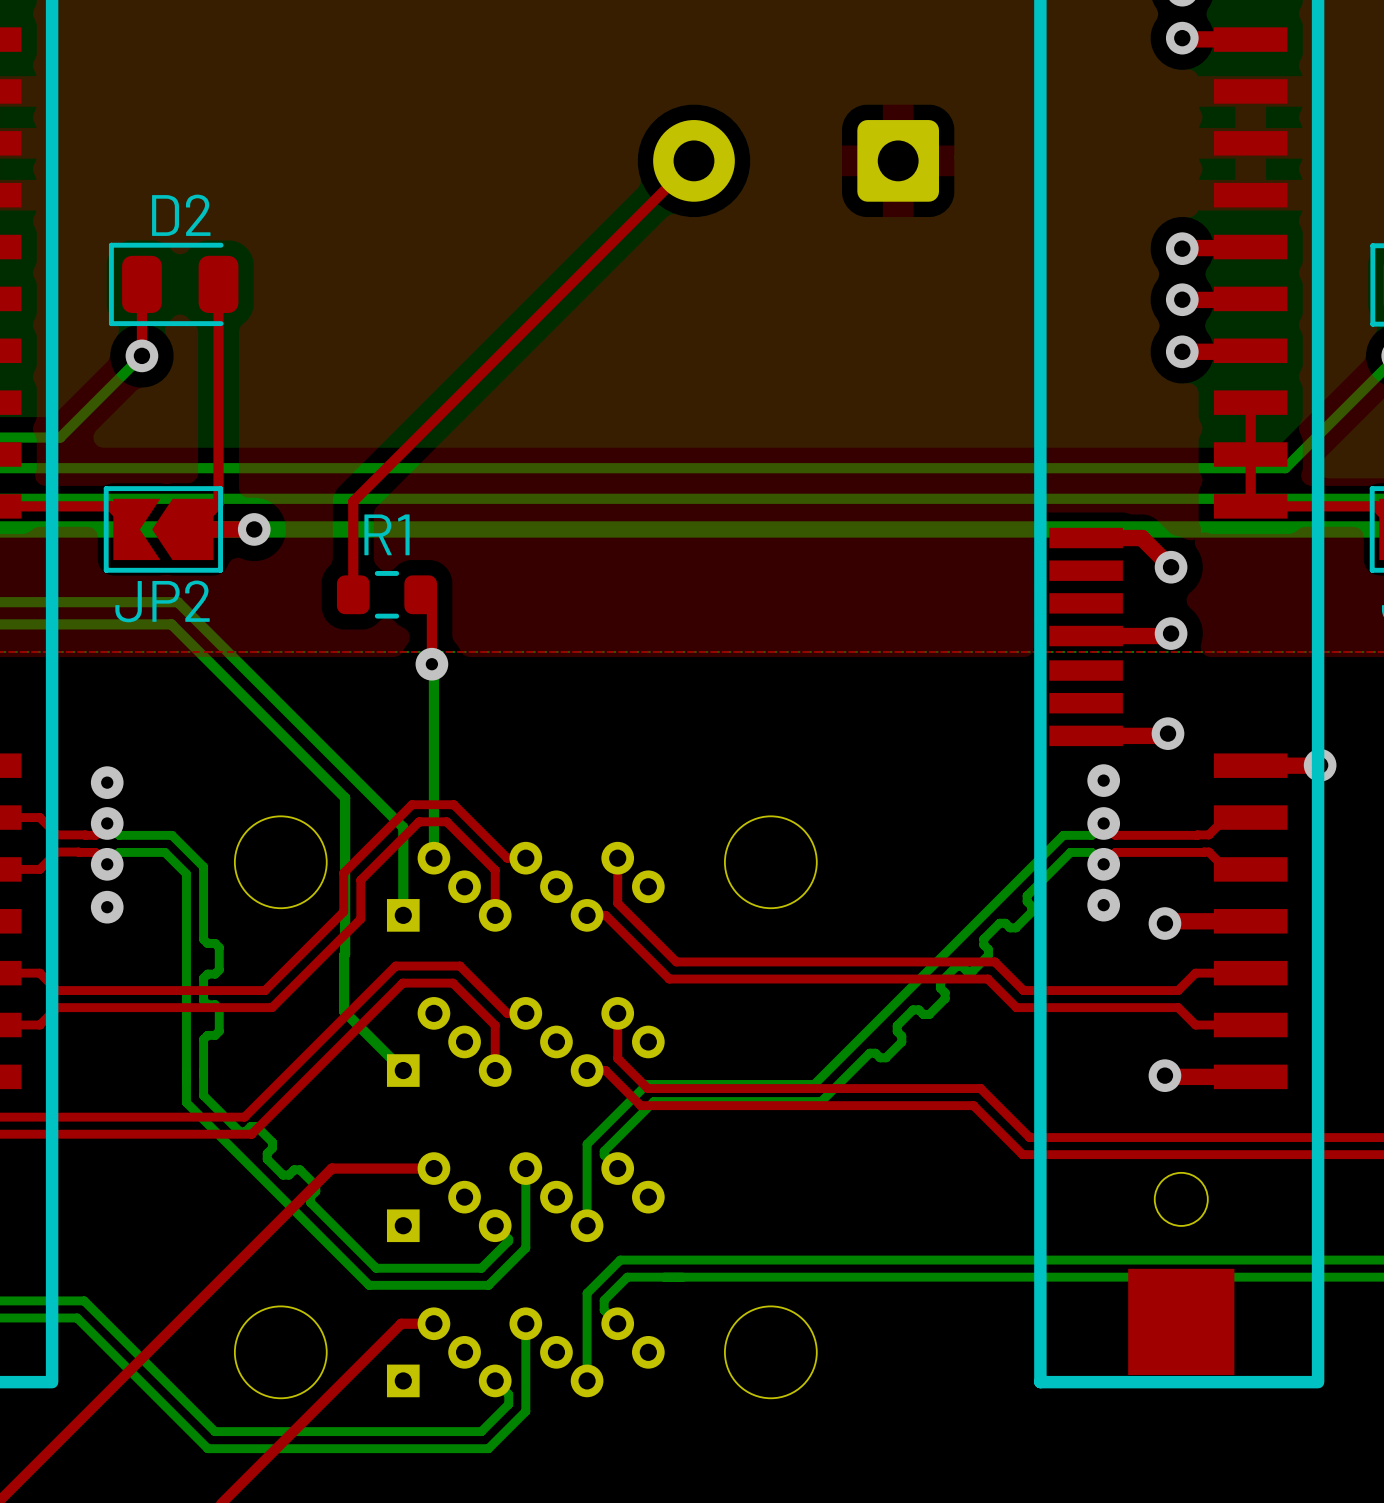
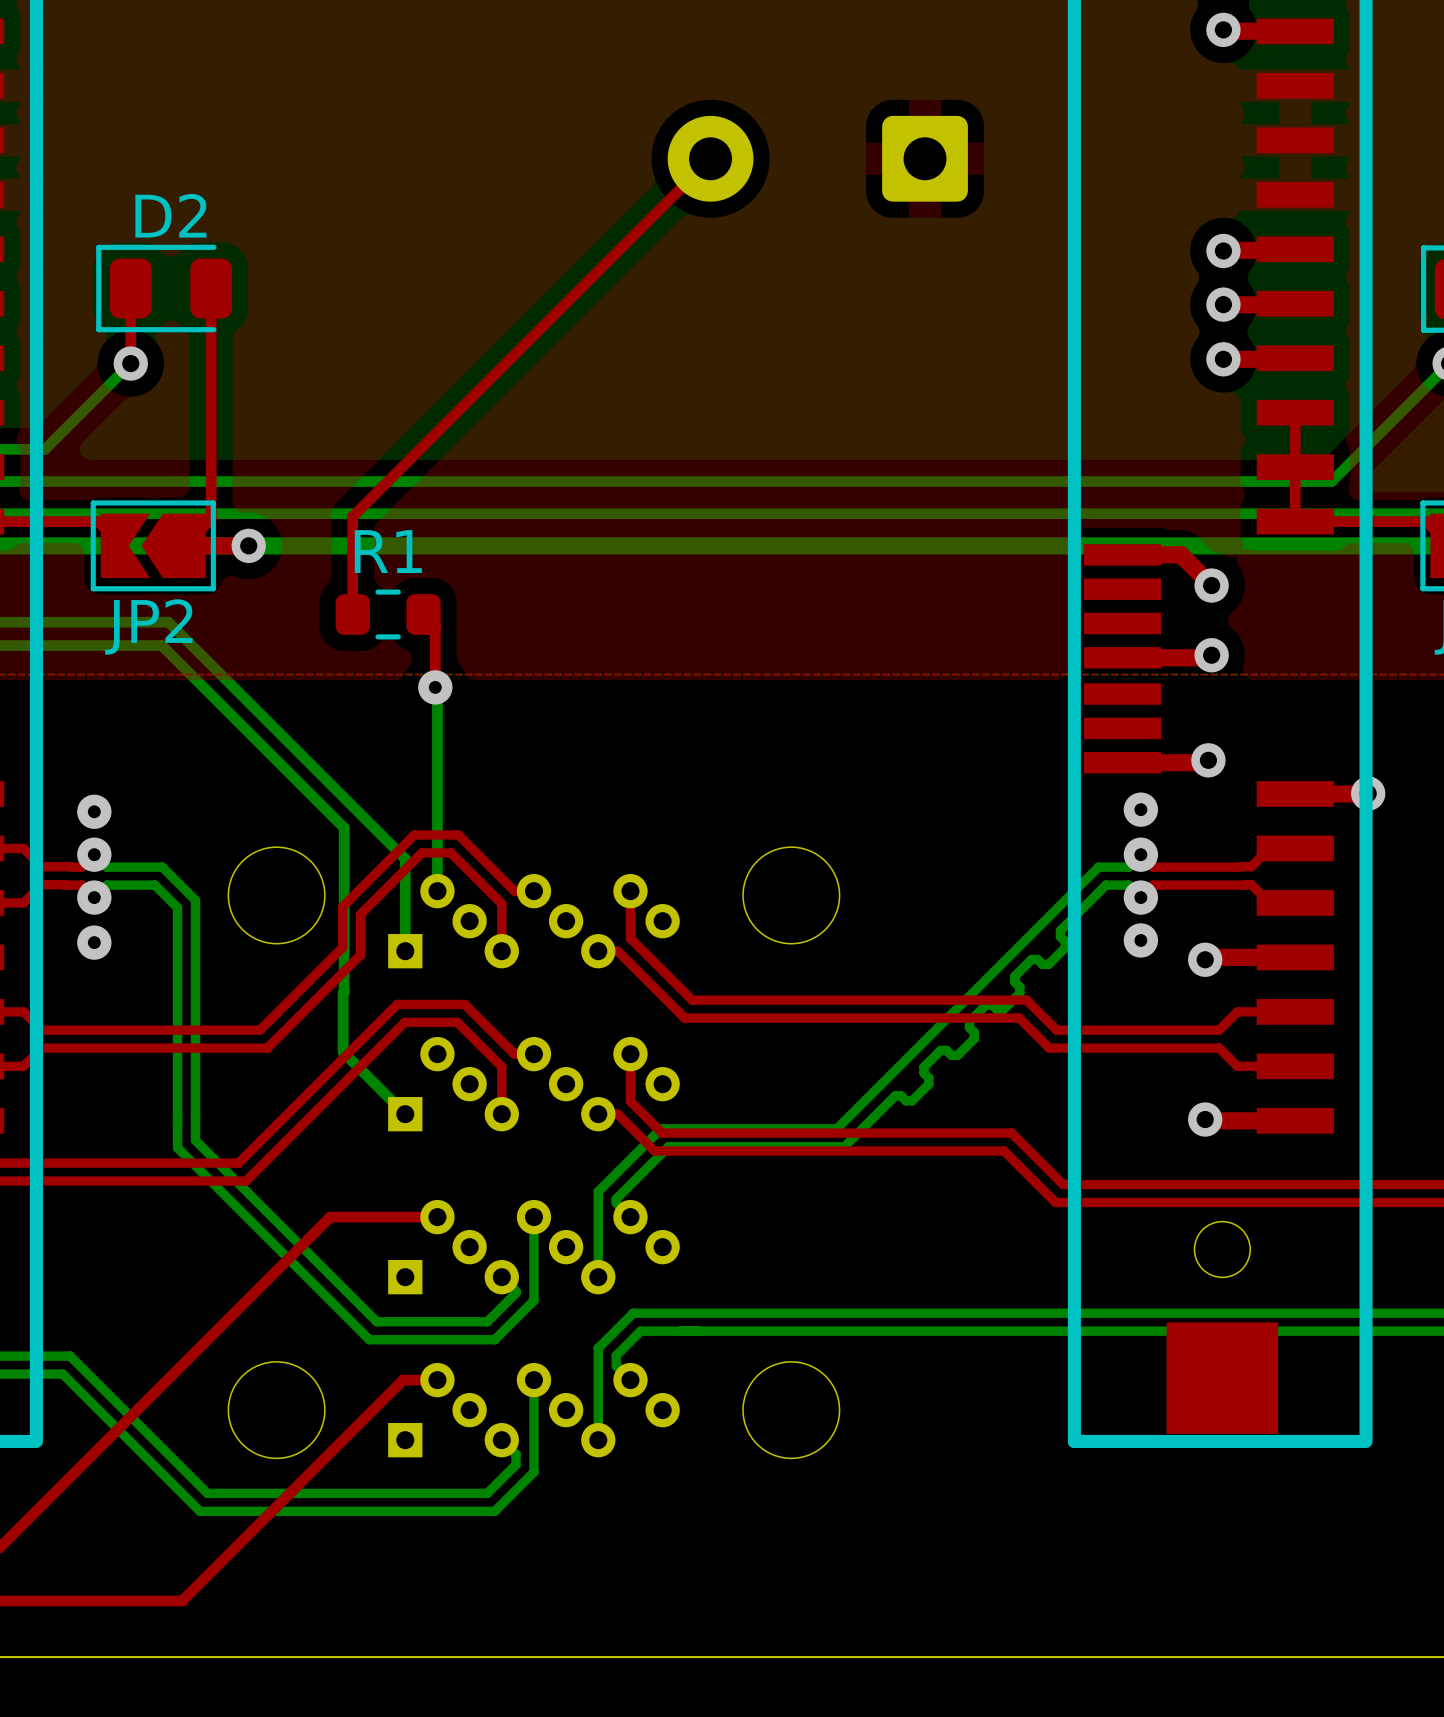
bottom track: (203, 939) (207, 943) (215, 943) (219, 947) (219, 970) (215, 974) (207, 974) (203, 978) -> (195, 976) (195, 1017)
bottom track: (203, 1000) (207, 1004) (215, 1004) (219, 1008) (219, 1031) (215, 1035) (207, 1035) (203, 1039) -> (195, 1040) (195, 1081)
bottom track: (203, 1095) (239, 1131) (245, 1131) (250, 1126) (256, 1126) (272, 1142) (272, 1148) (267, 1153) (267, 1159) (283, 1175) (288, 1175) (294, 1169) (299, 1169) (315, 1185) (315, 1191) (310, 1196) (310, 1202) (376, 1268) -> (195, 1140) (376, 1321)

